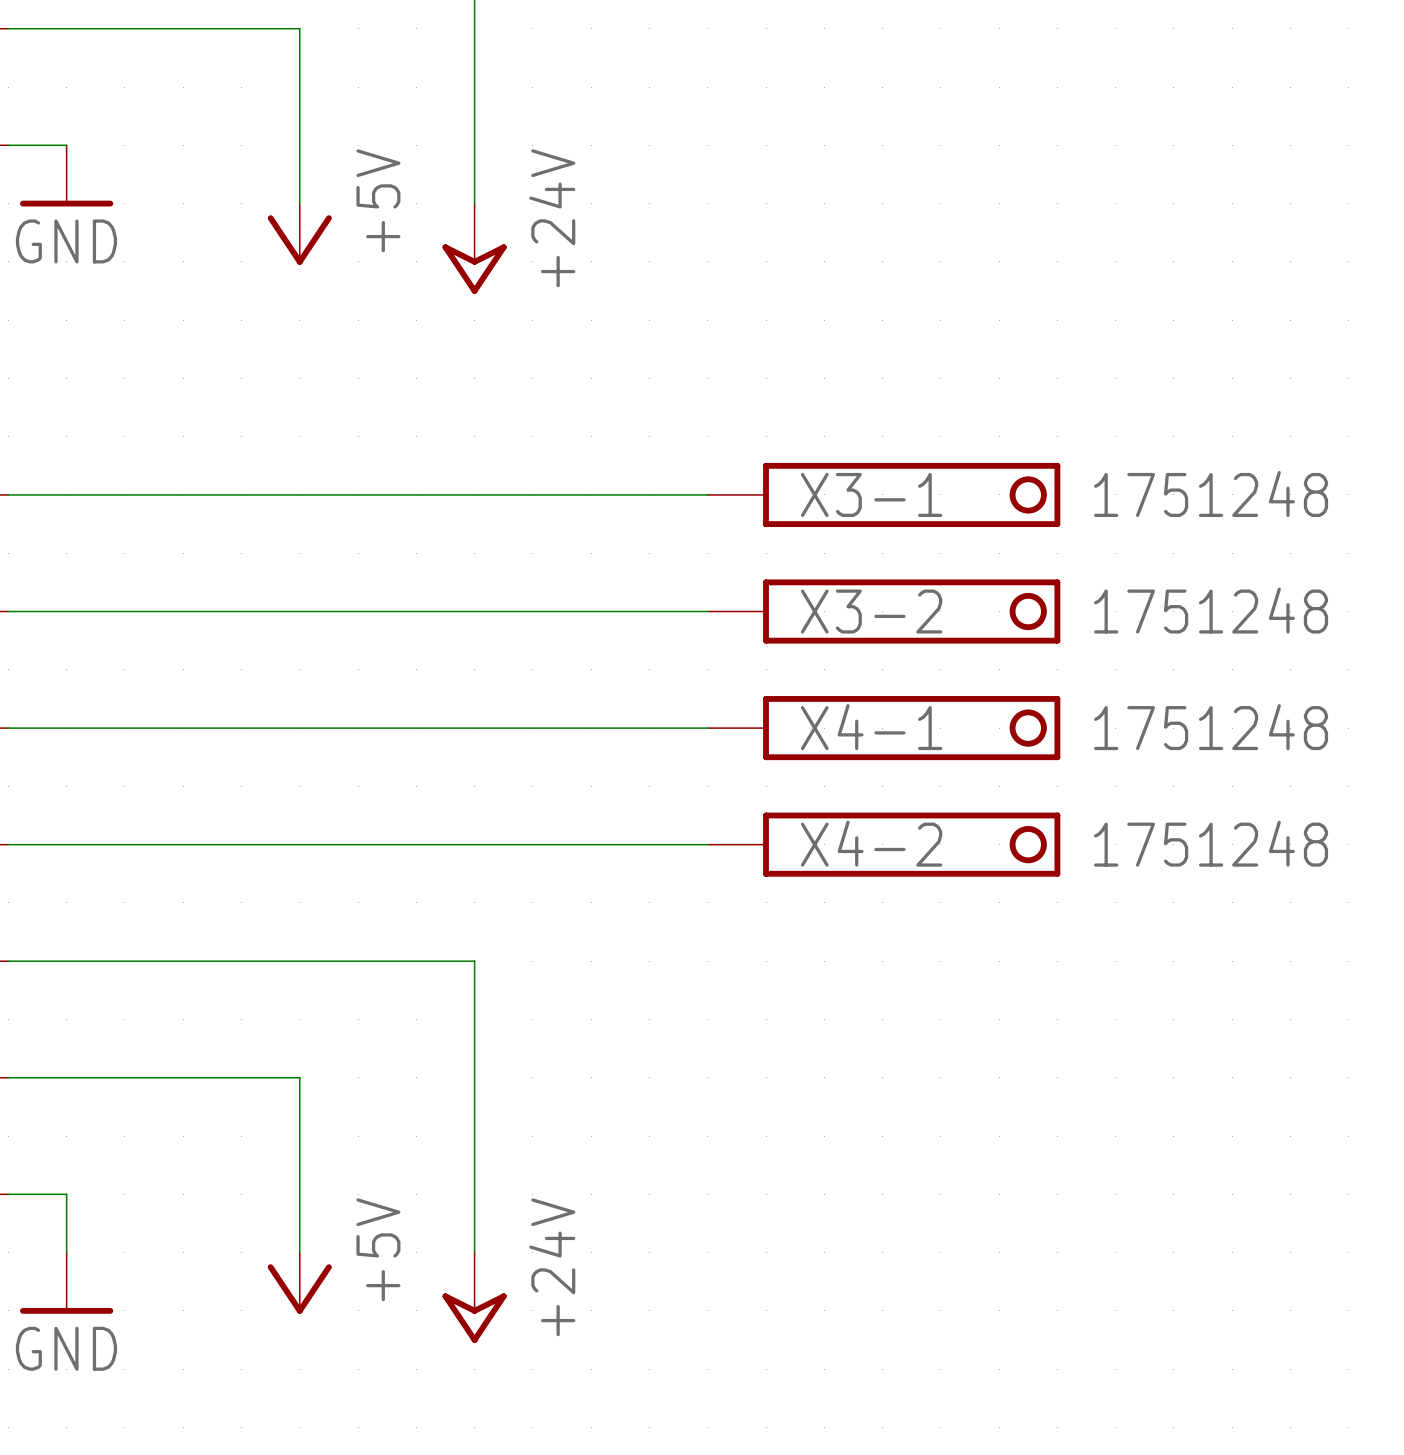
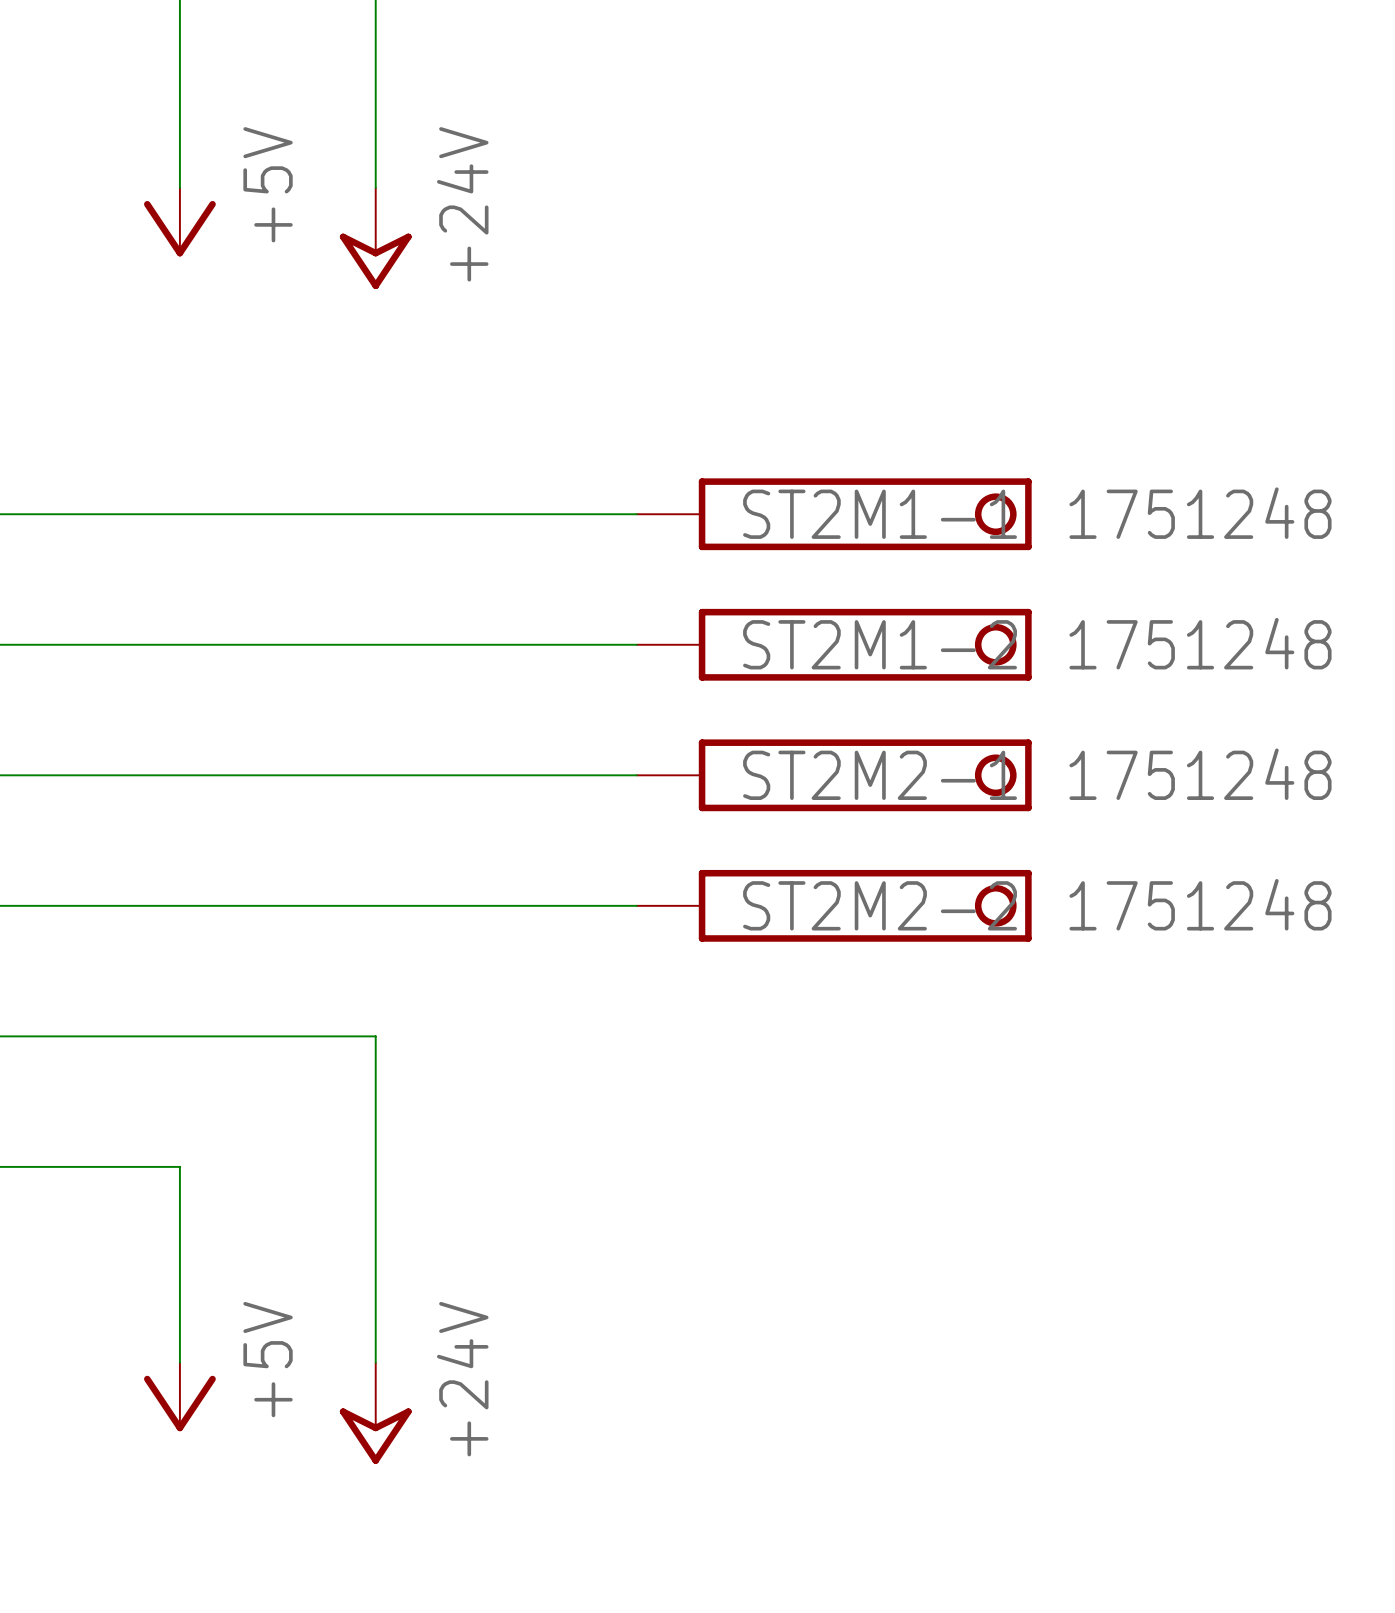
X3-1 name: X3-1 (871, 494) -> ST2M1-1 (880, 514)
X3-2 name: X3-2 (871, 611) -> ST2M1-2 (880, 644)
X4-1 name: X4-1 (871, 727) -> ST2M2-1 (880, 775)
X4-2 name: X4-2 (871, 843) -> ST2M2-2 (880, 905)

